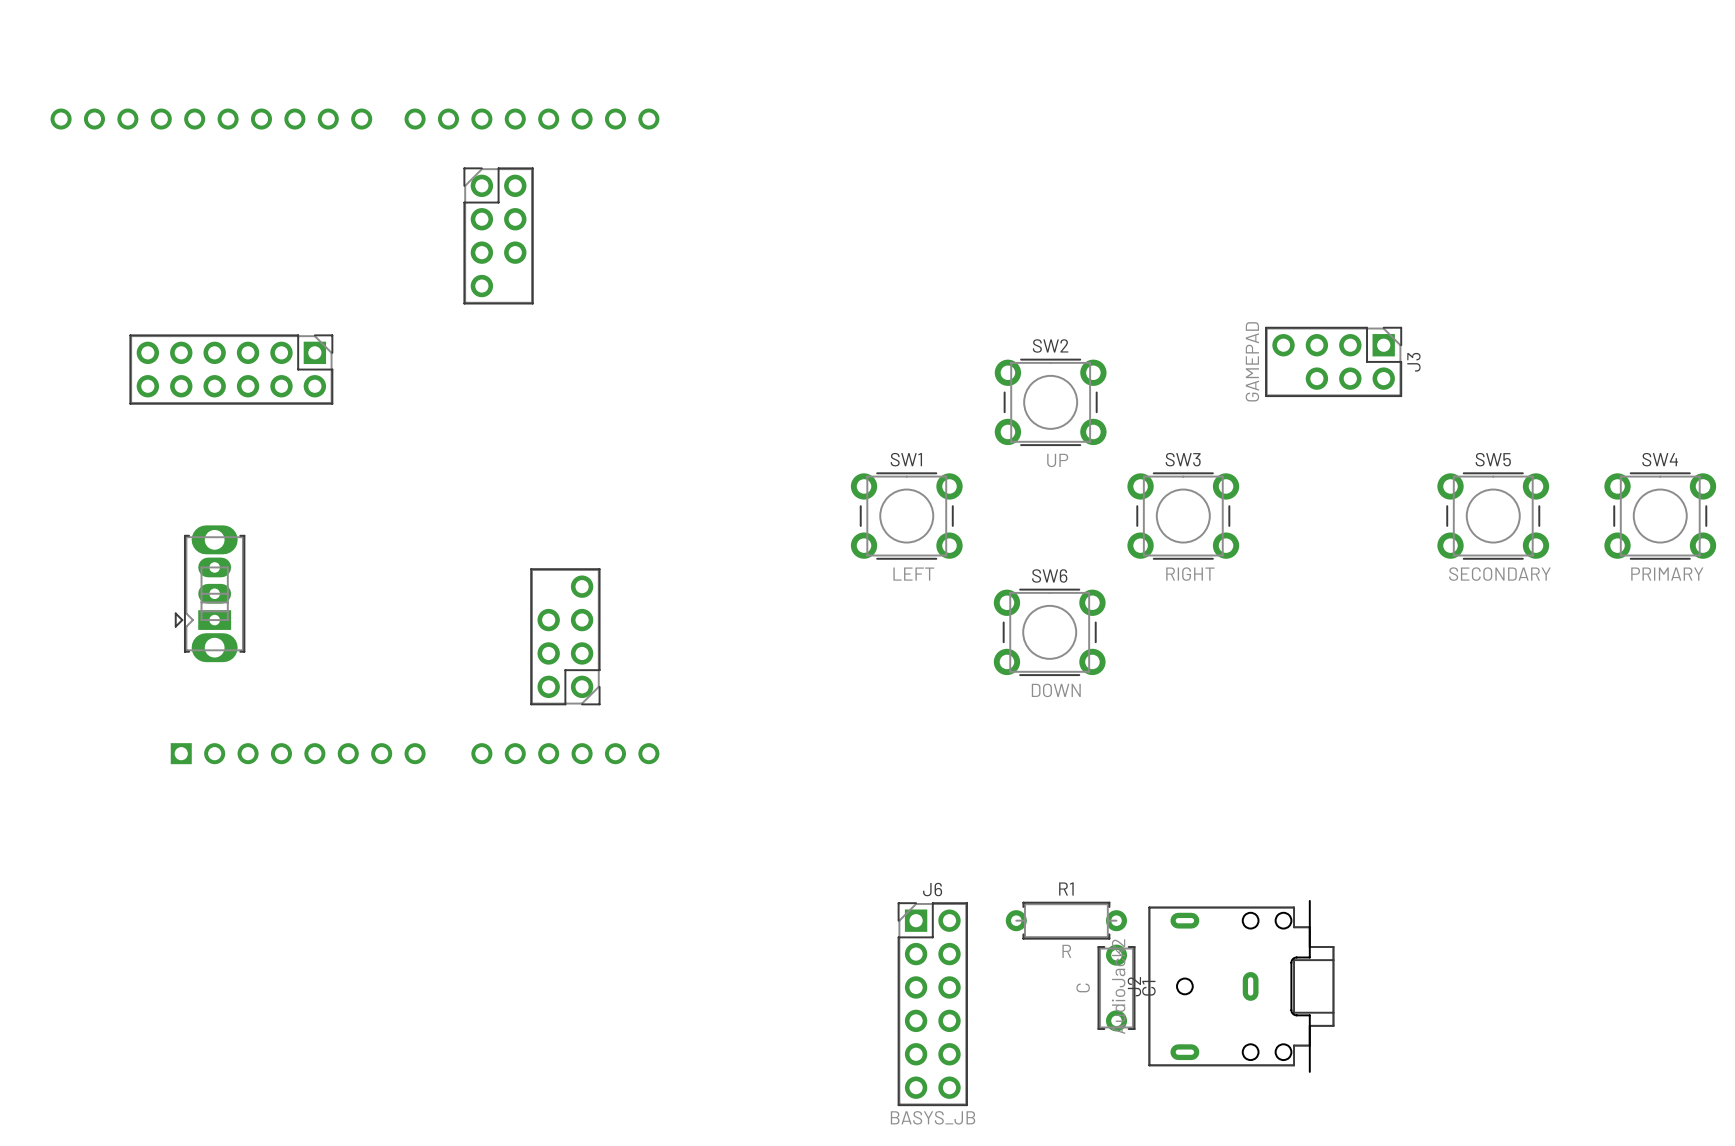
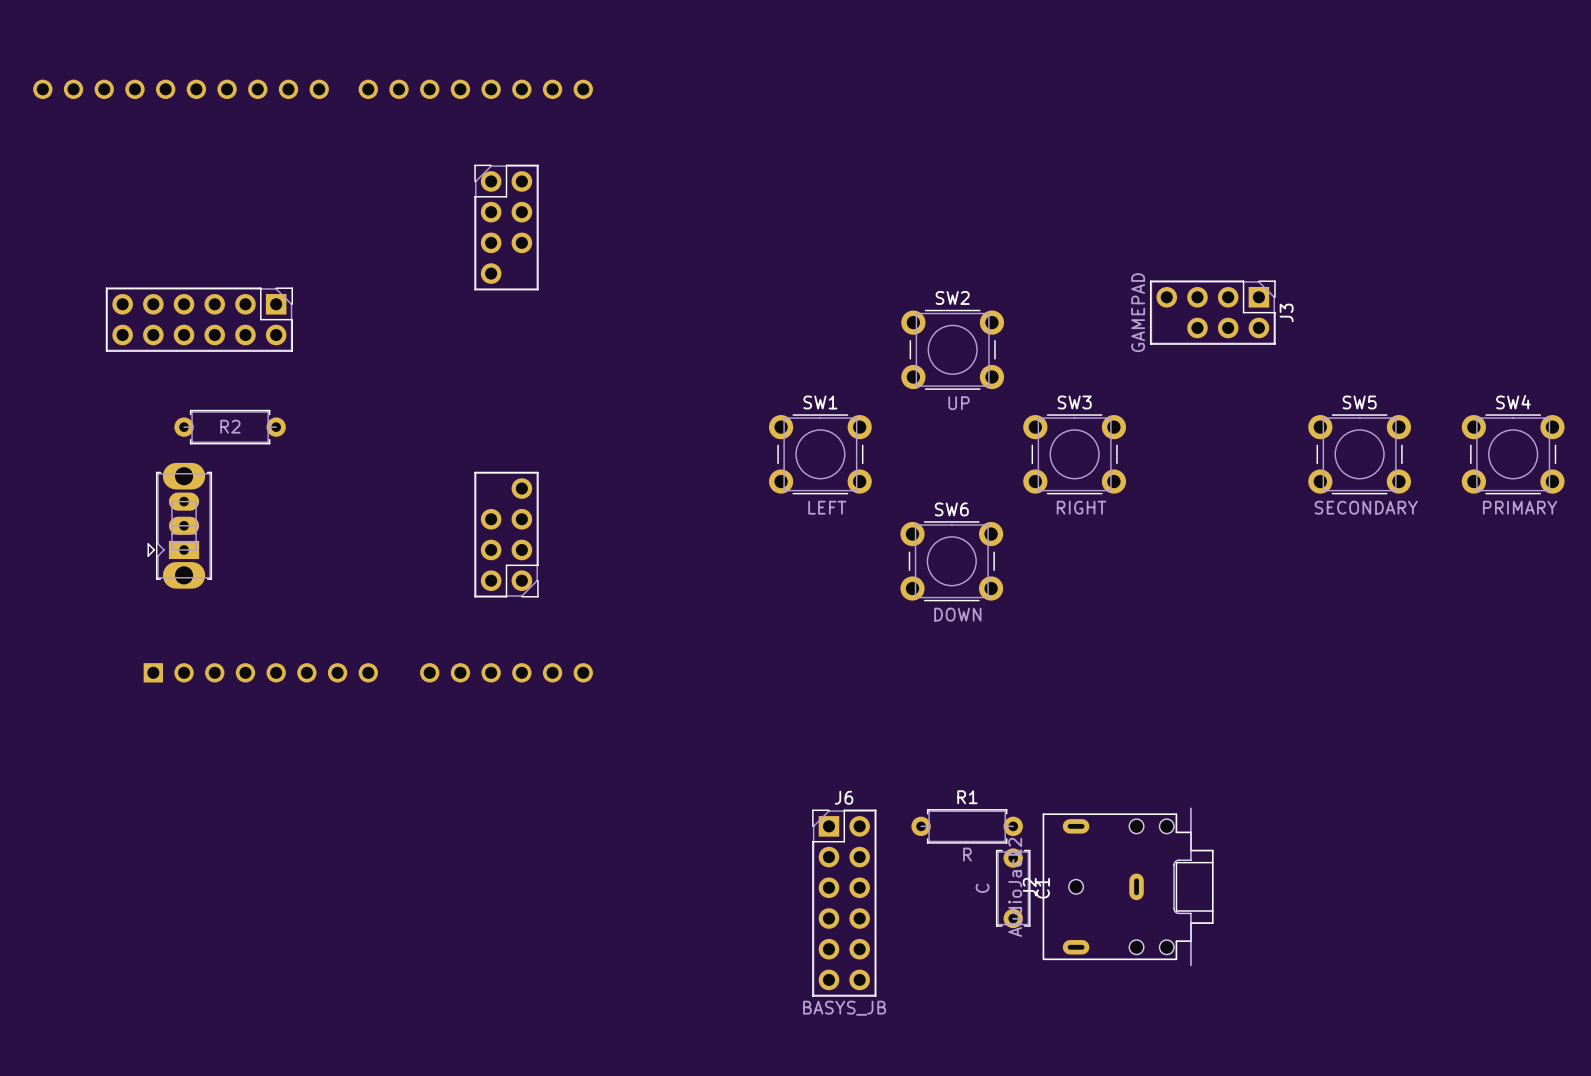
part position: (498, 235) -> (506, 227)
R2: none -> (230, 427)
part position: (565, 636) -> (506, 534)

